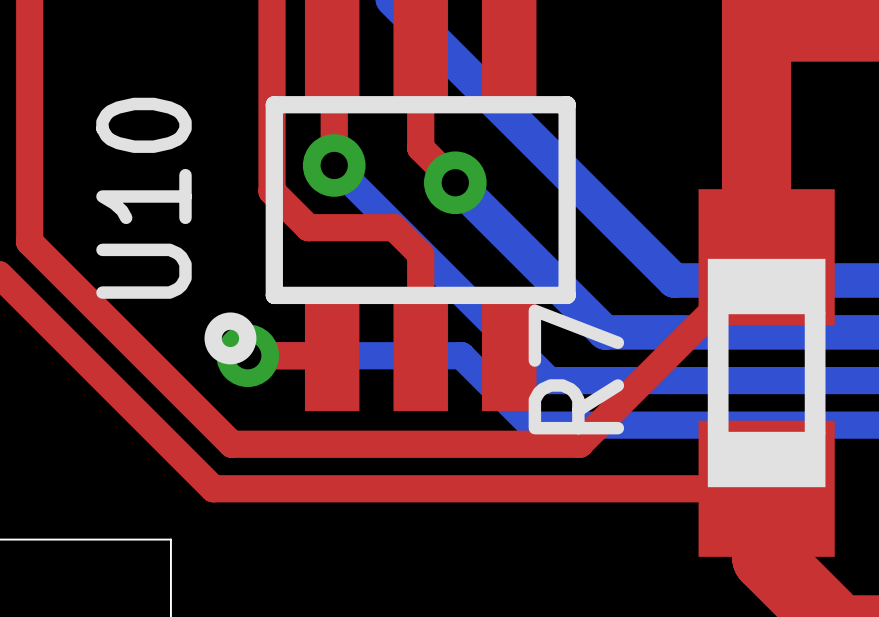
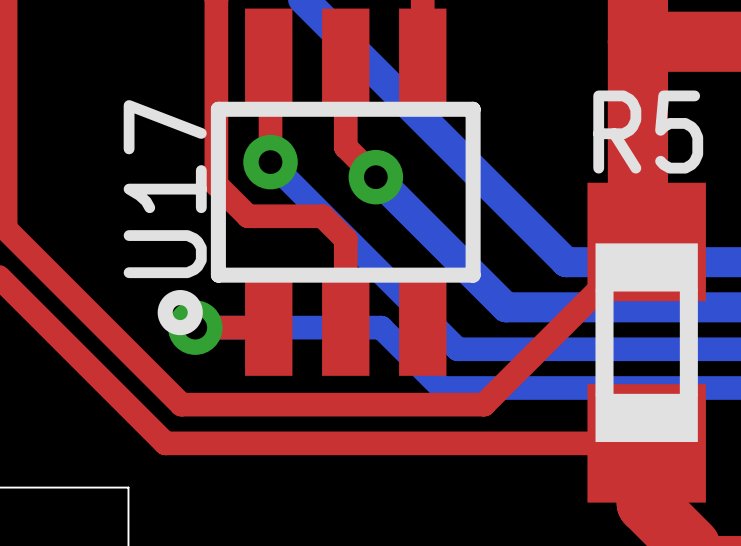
U10 name: U10 (143, 198) -> U17 (165, 189)
R7 name: R7 (576, 369) -> R5 (648, 132)

